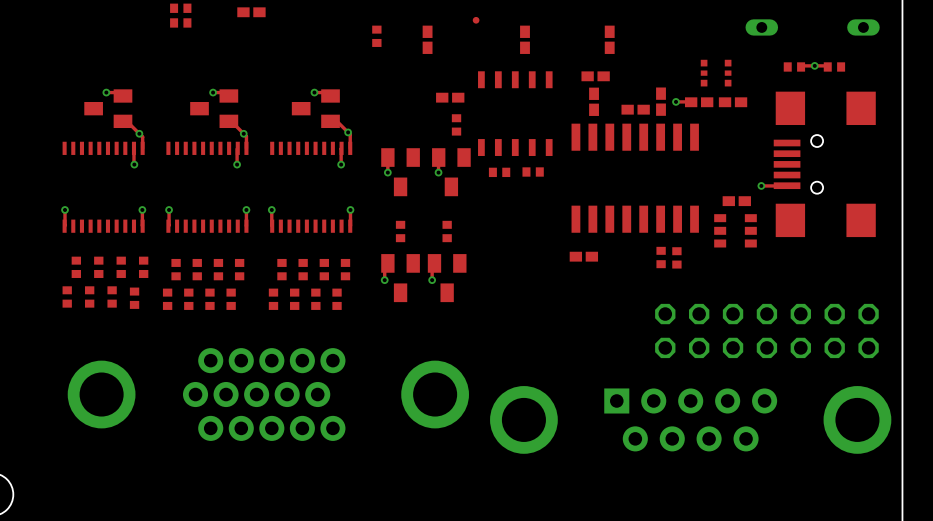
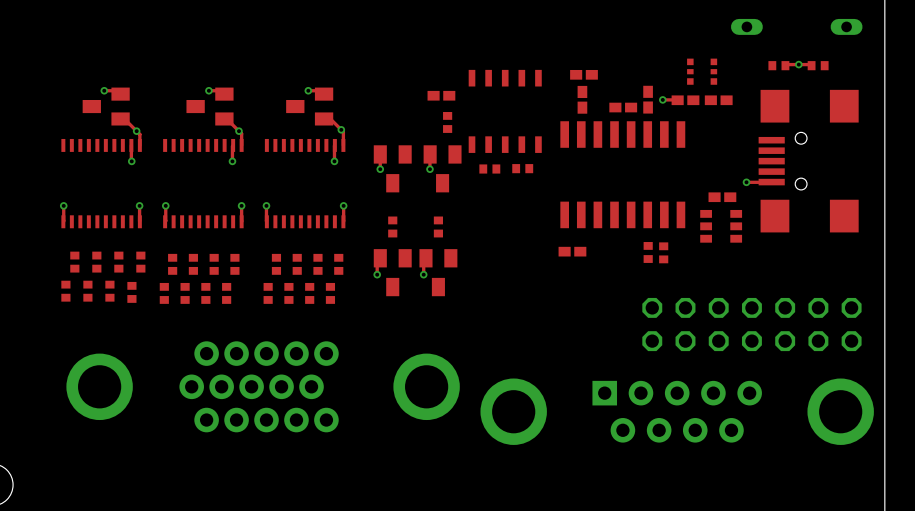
part: (180, 8) -> none
part: (251, 12) -> none
part: (476, 20) -> none
part: (180, 22) -> none
part: (376, 36) -> none
part: (427, 39) -> none
part: (525, 39) -> none
part: (609, 39) -> none

